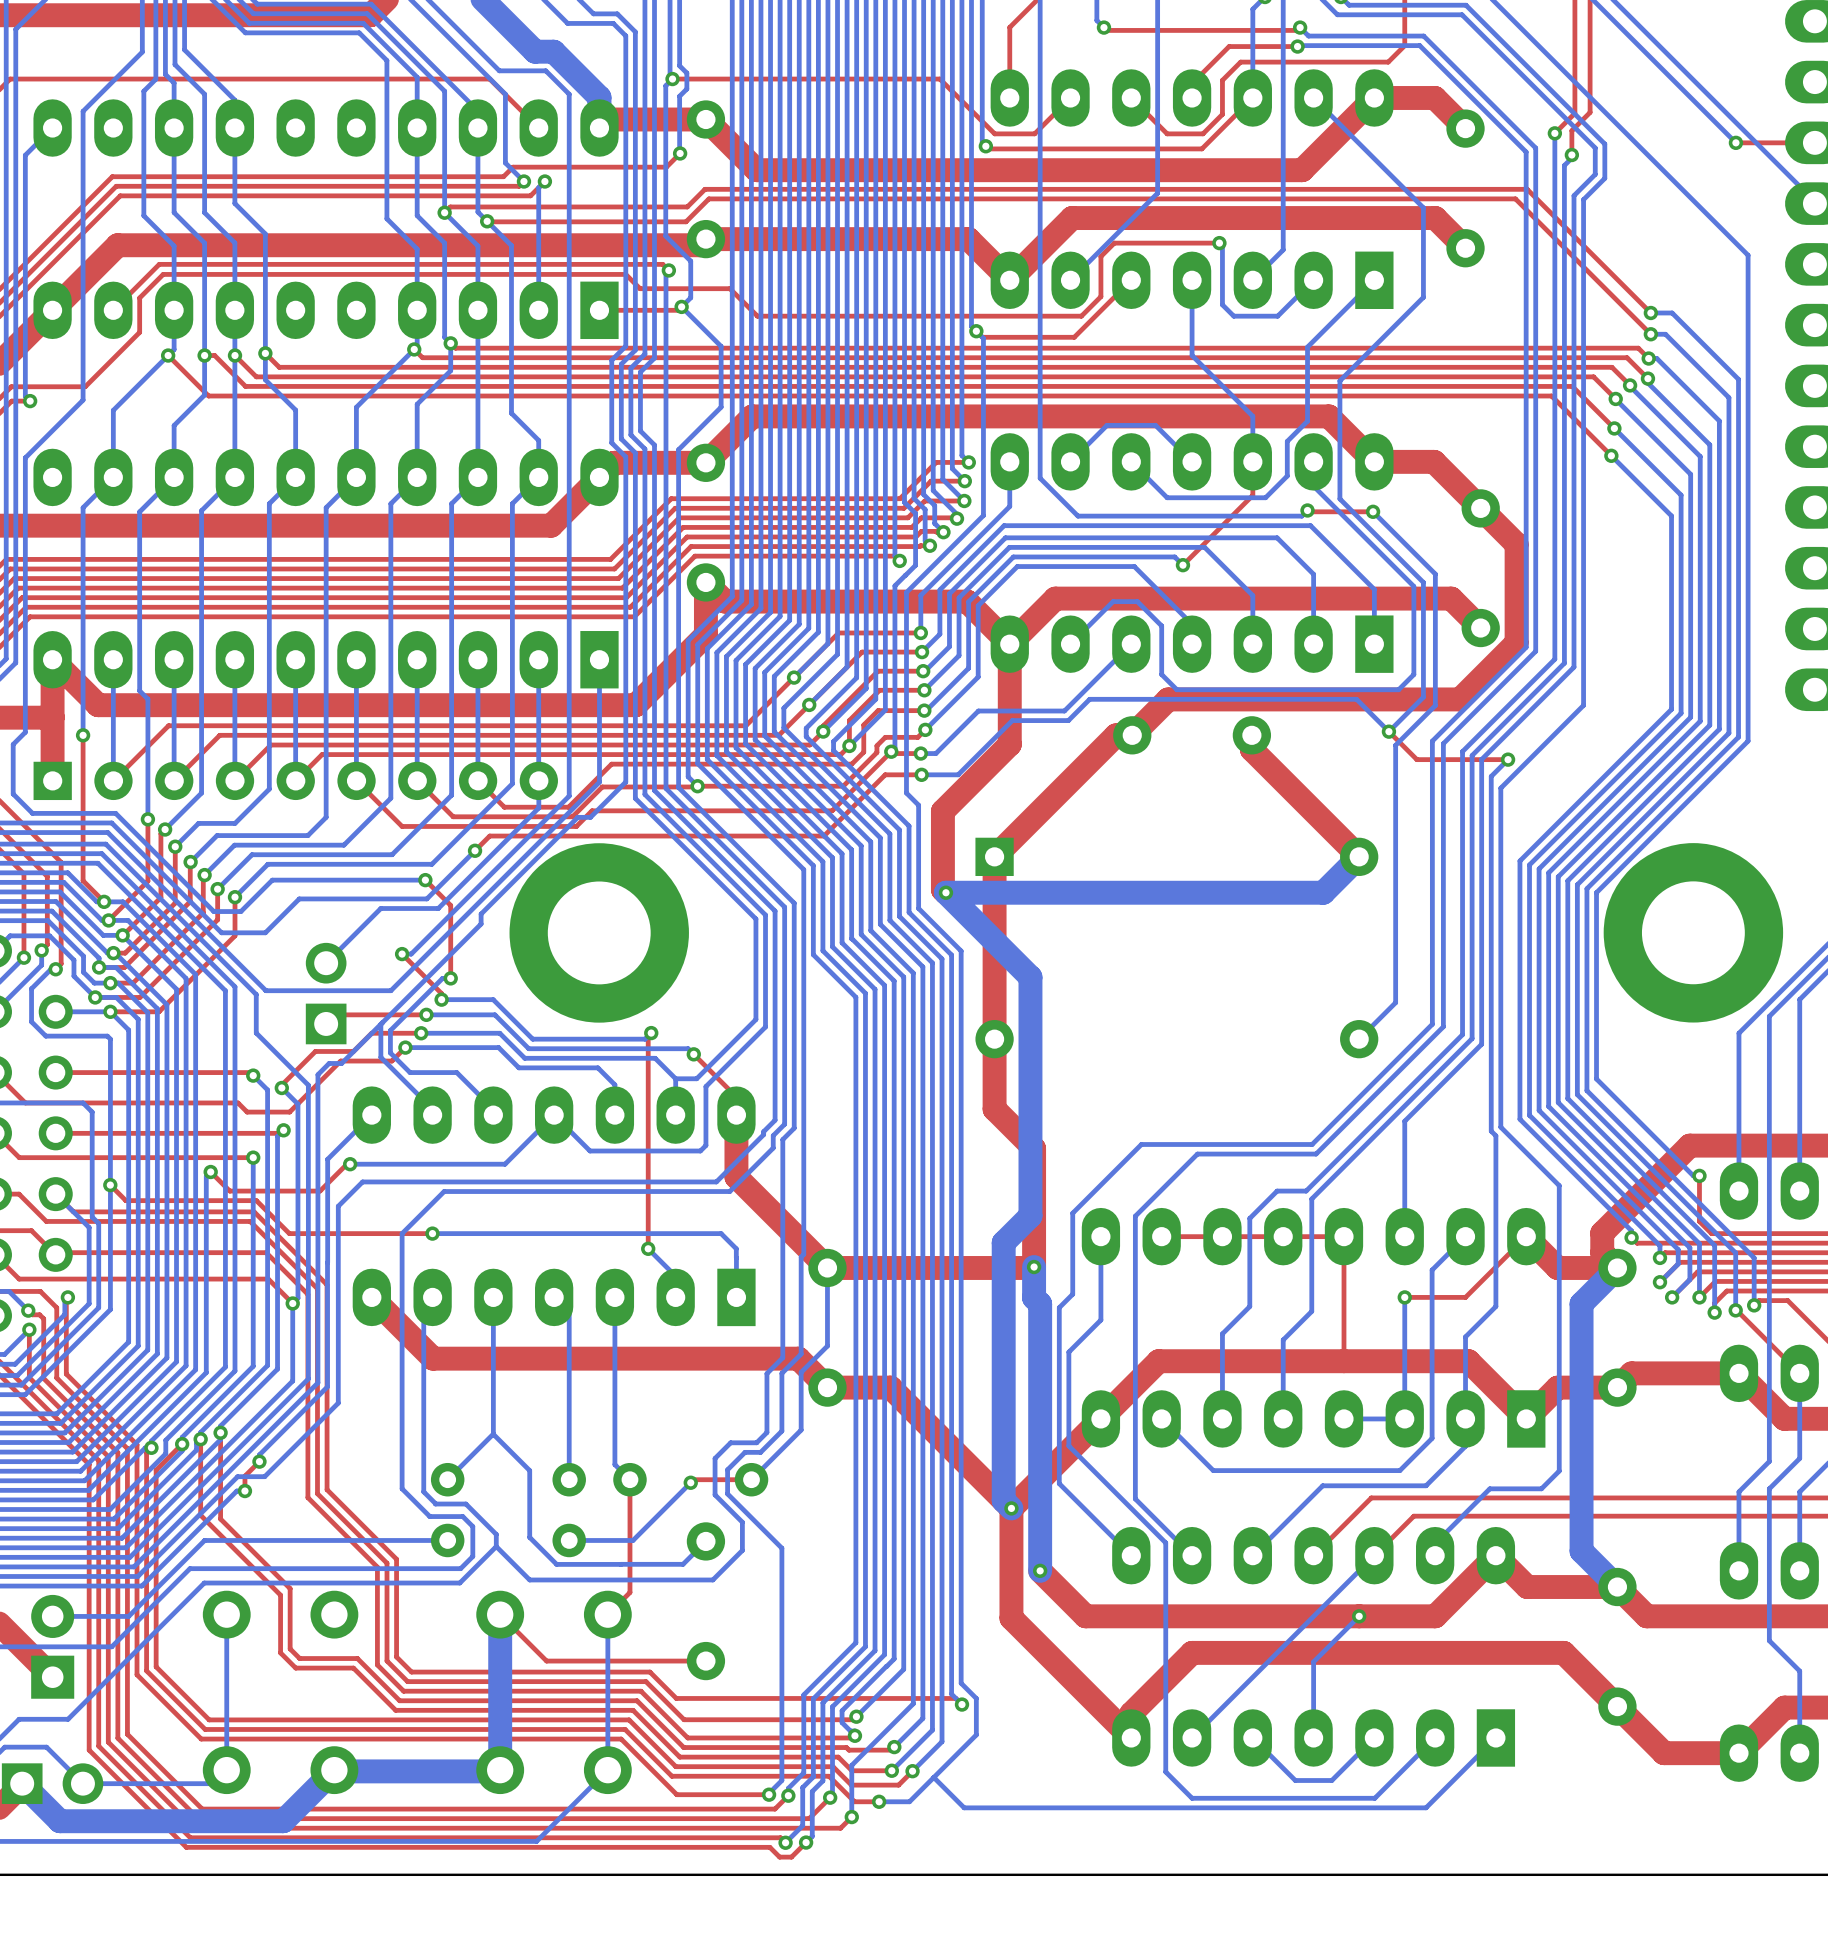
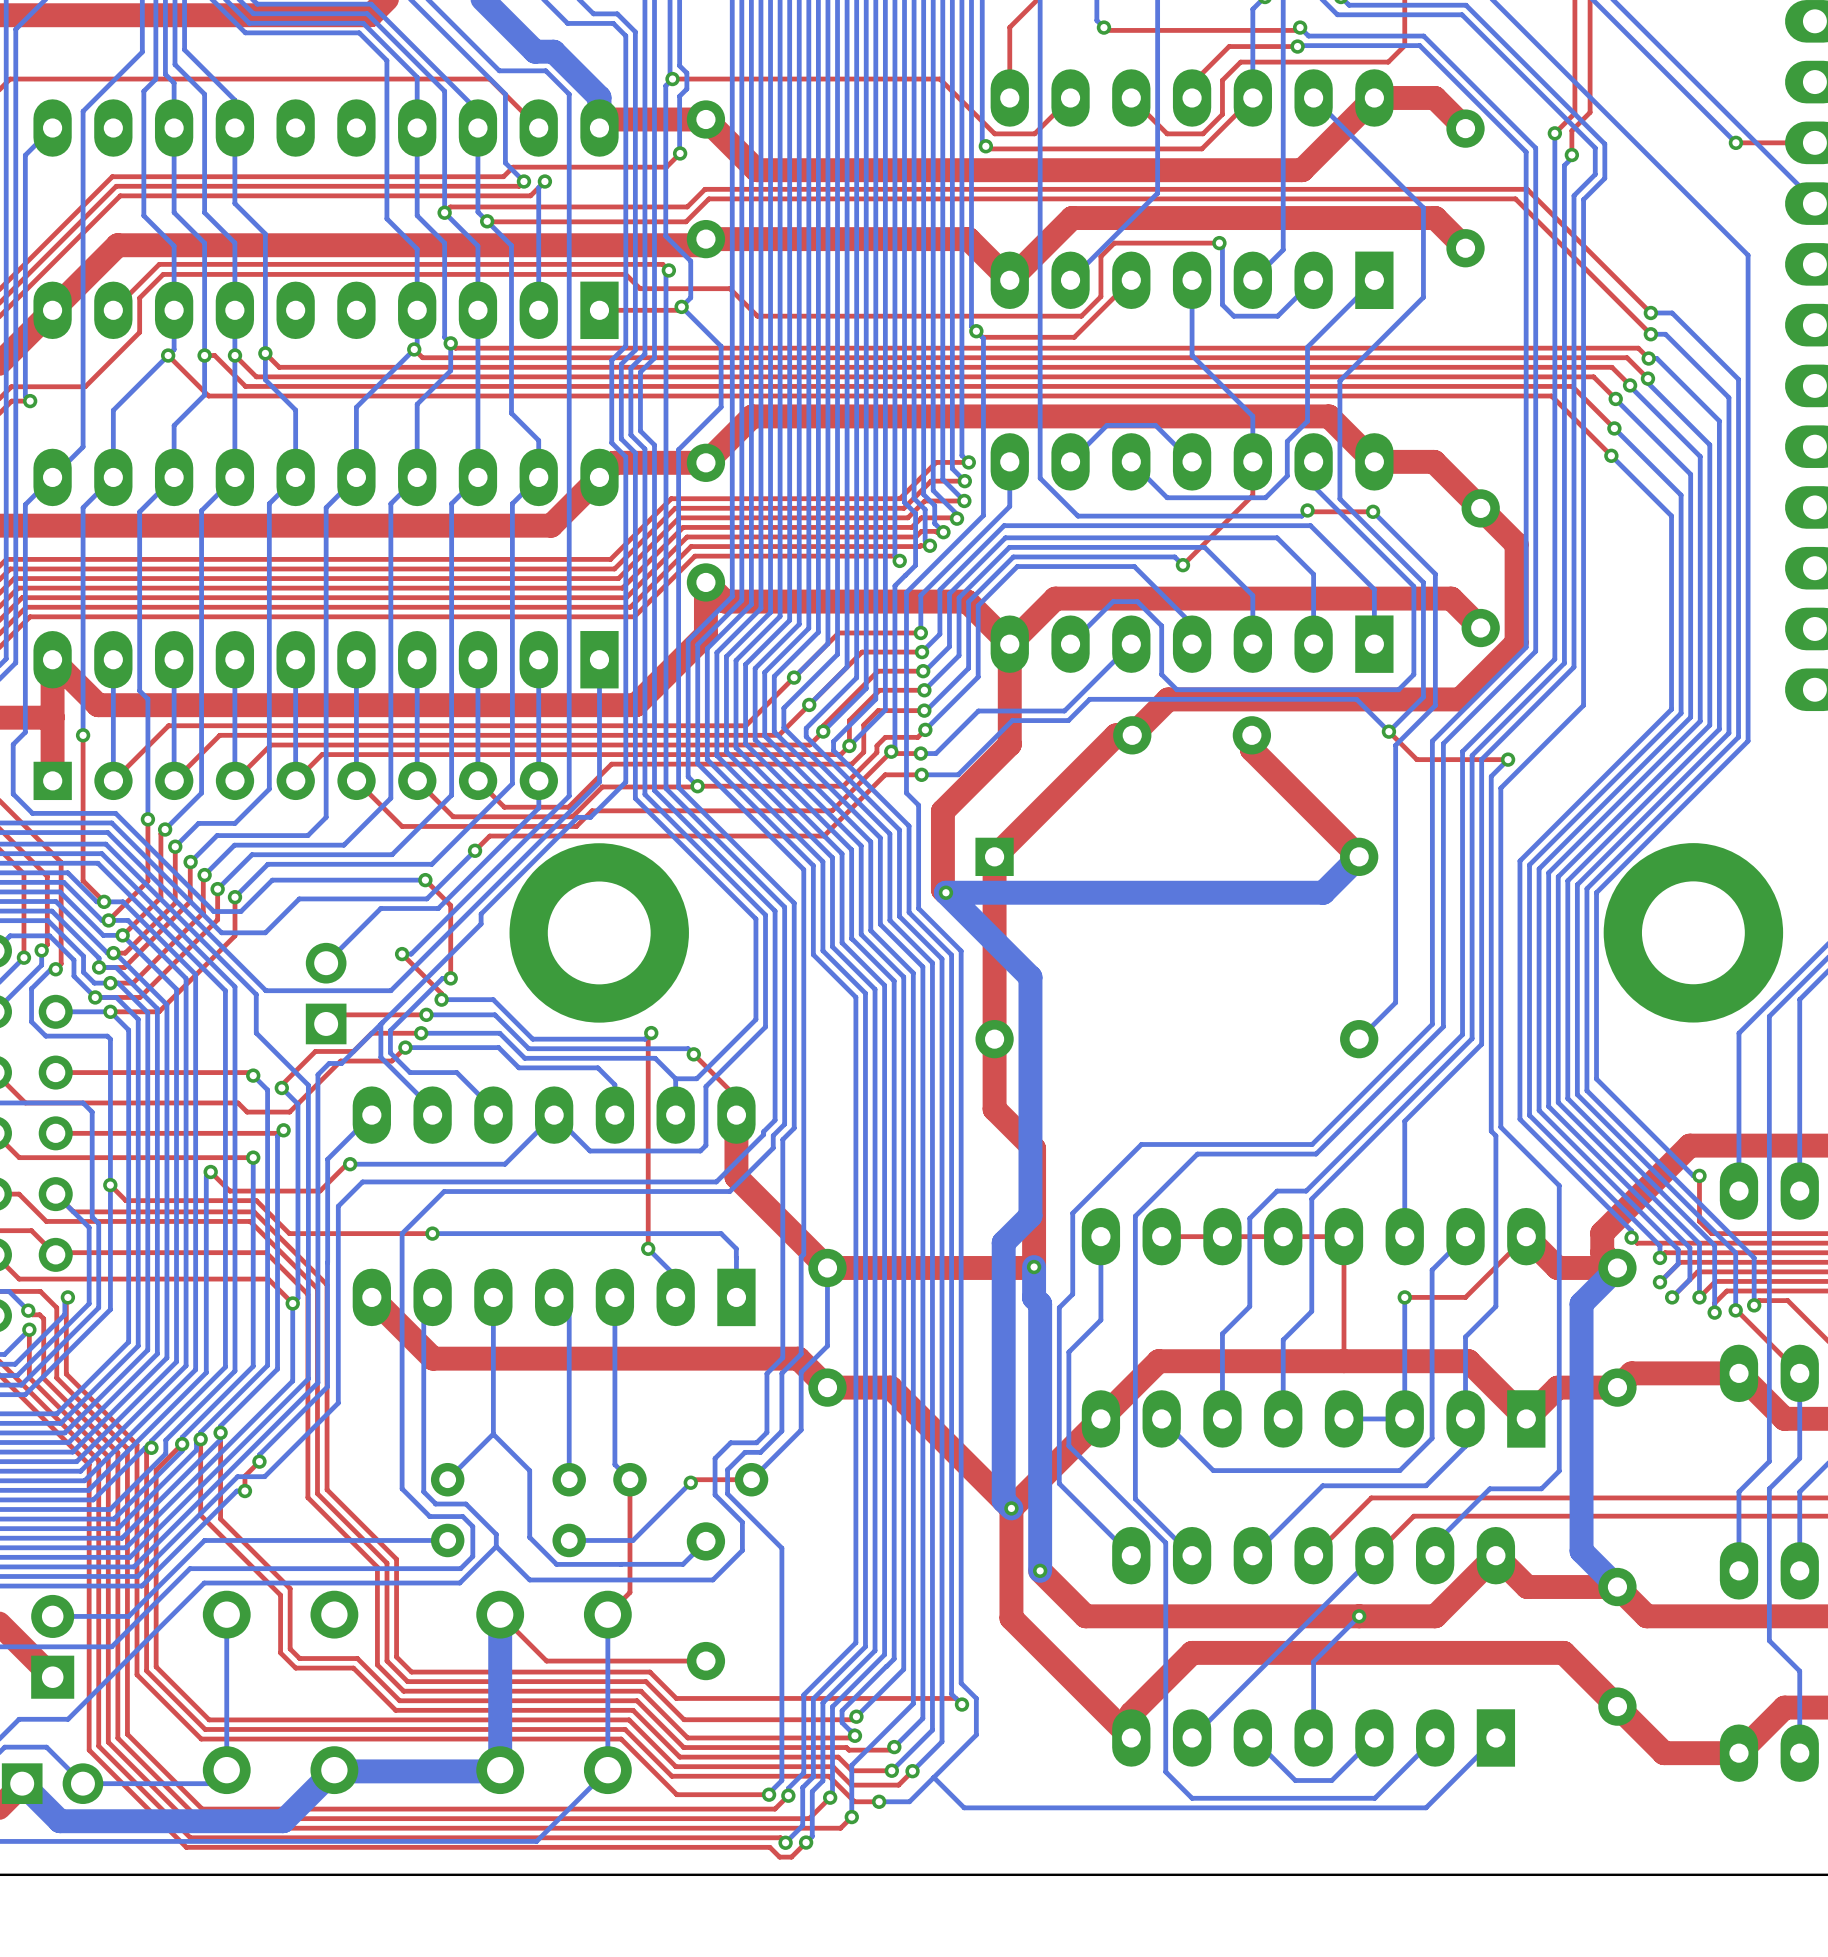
bottom track: (83, 400) (25, 457) (25, 504) -> (83, 400) (83, 446) (25, 504)

